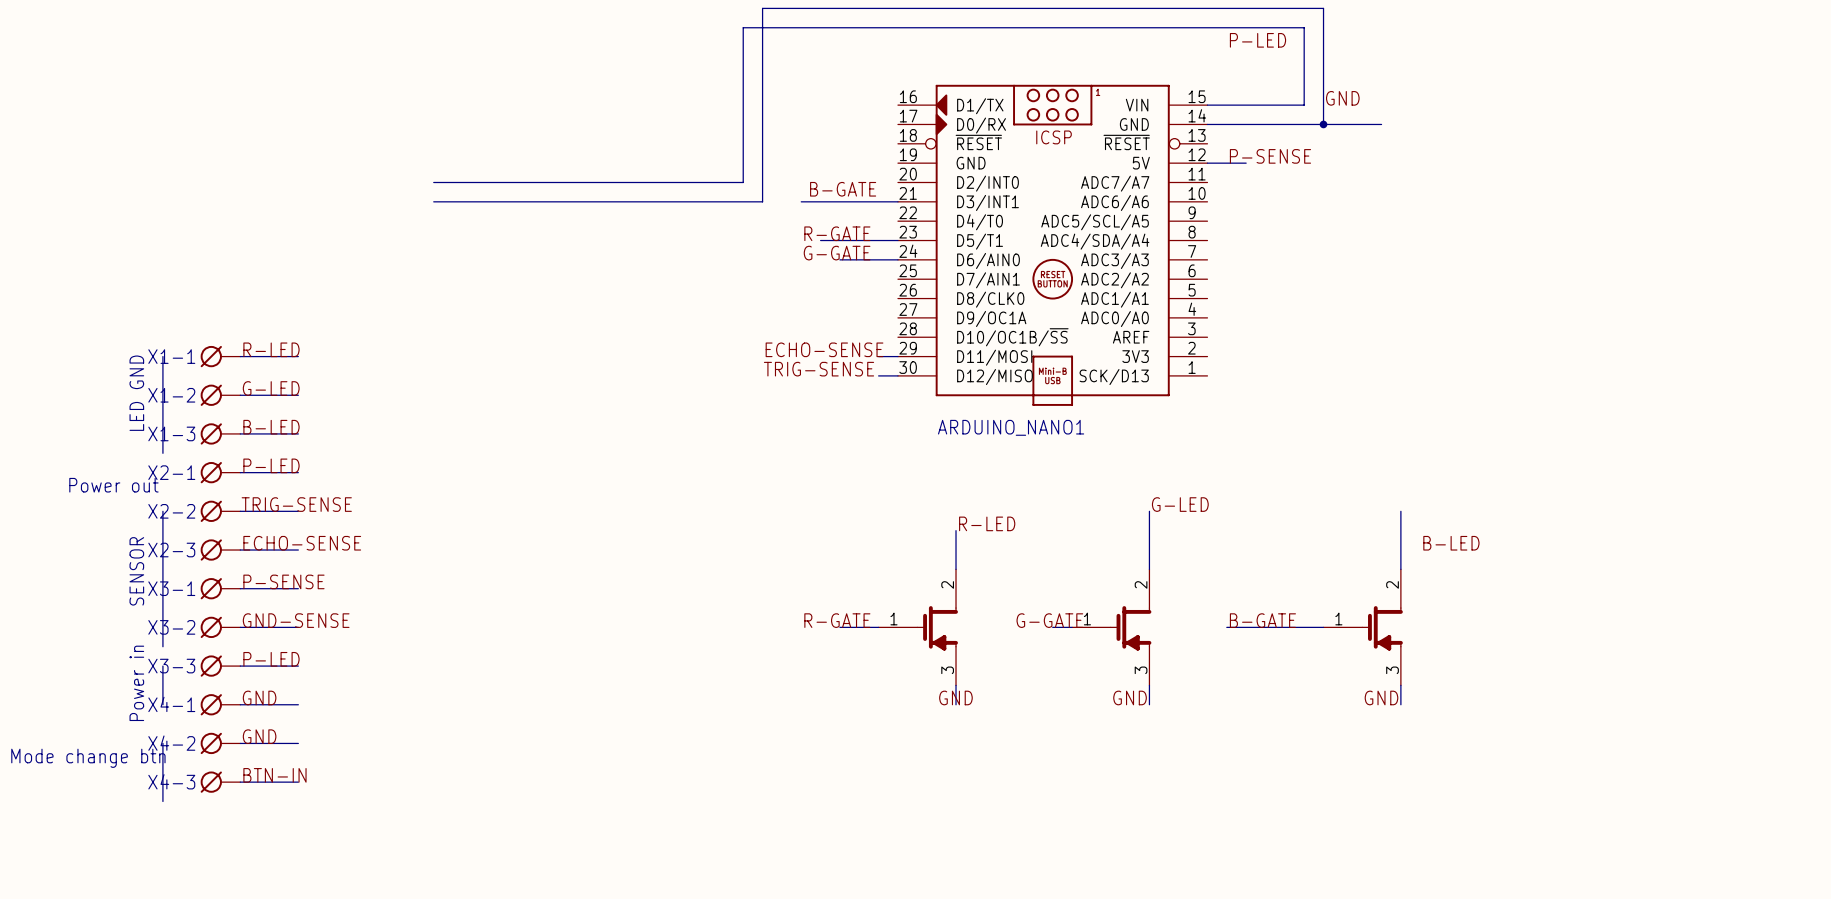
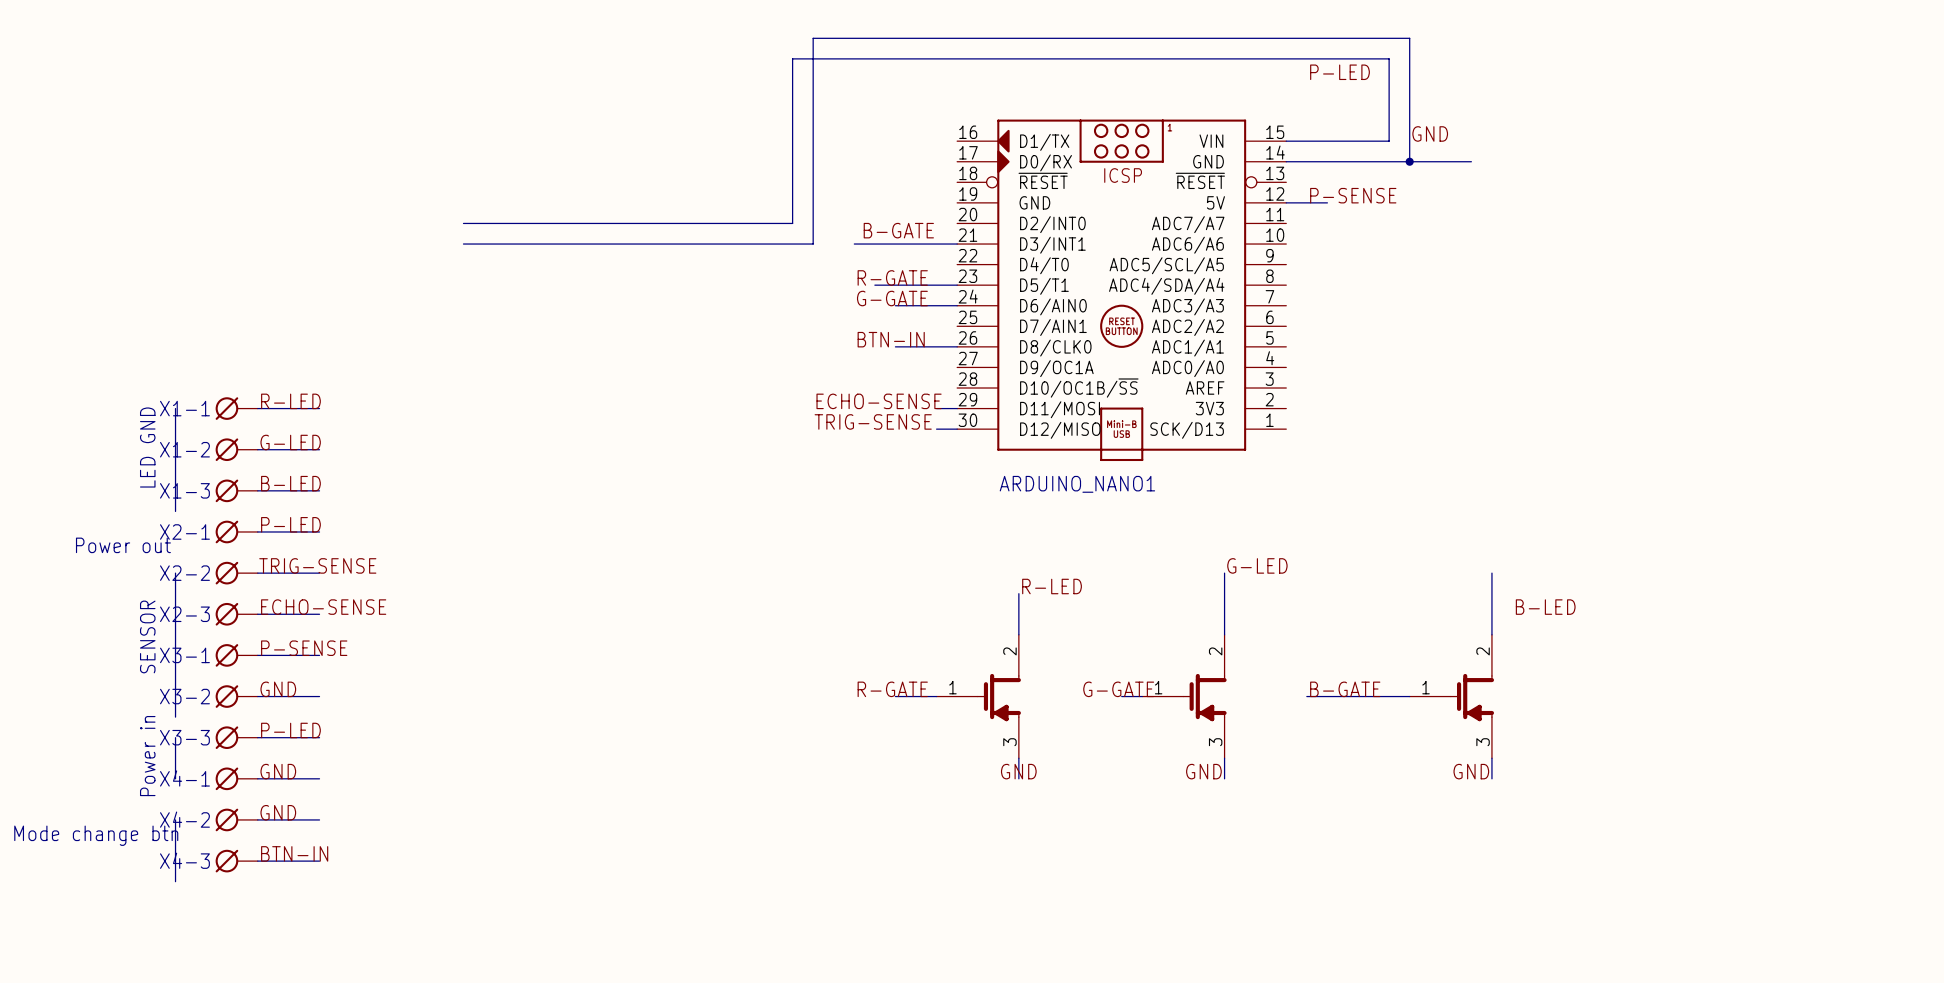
label: none -> BTN-IN (891, 339)
wire: none -> (895, 346) (957, 346)
label: GND-SENSE (296, 620) -> GND (278, 689)

